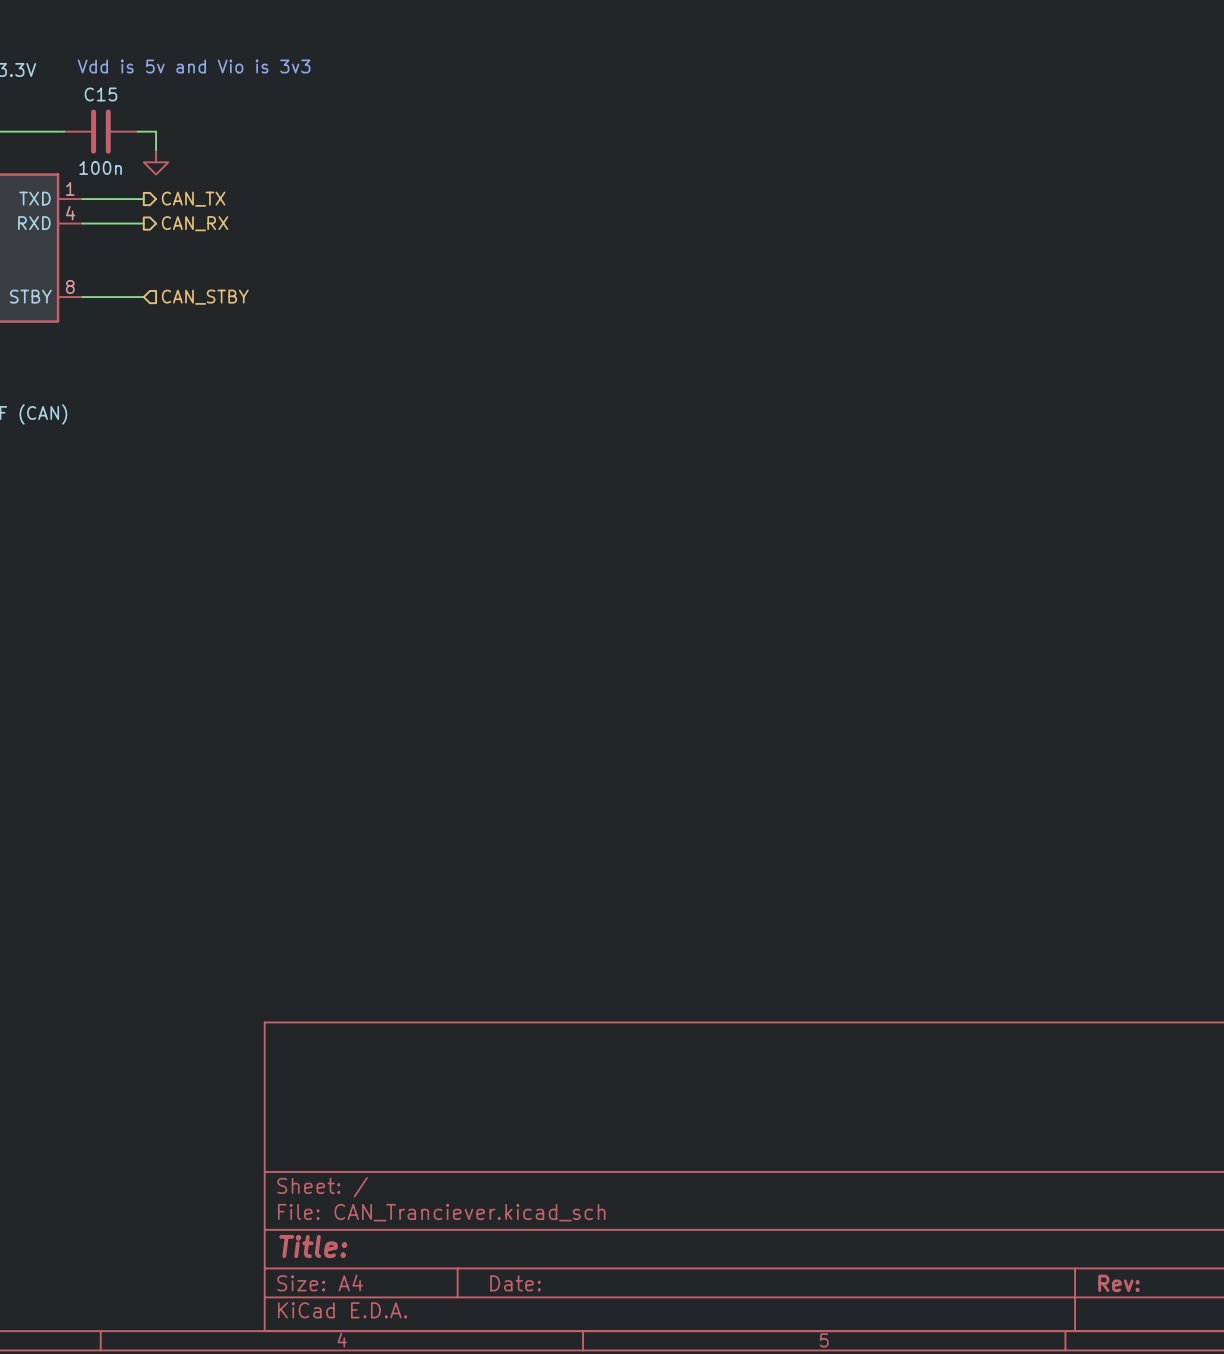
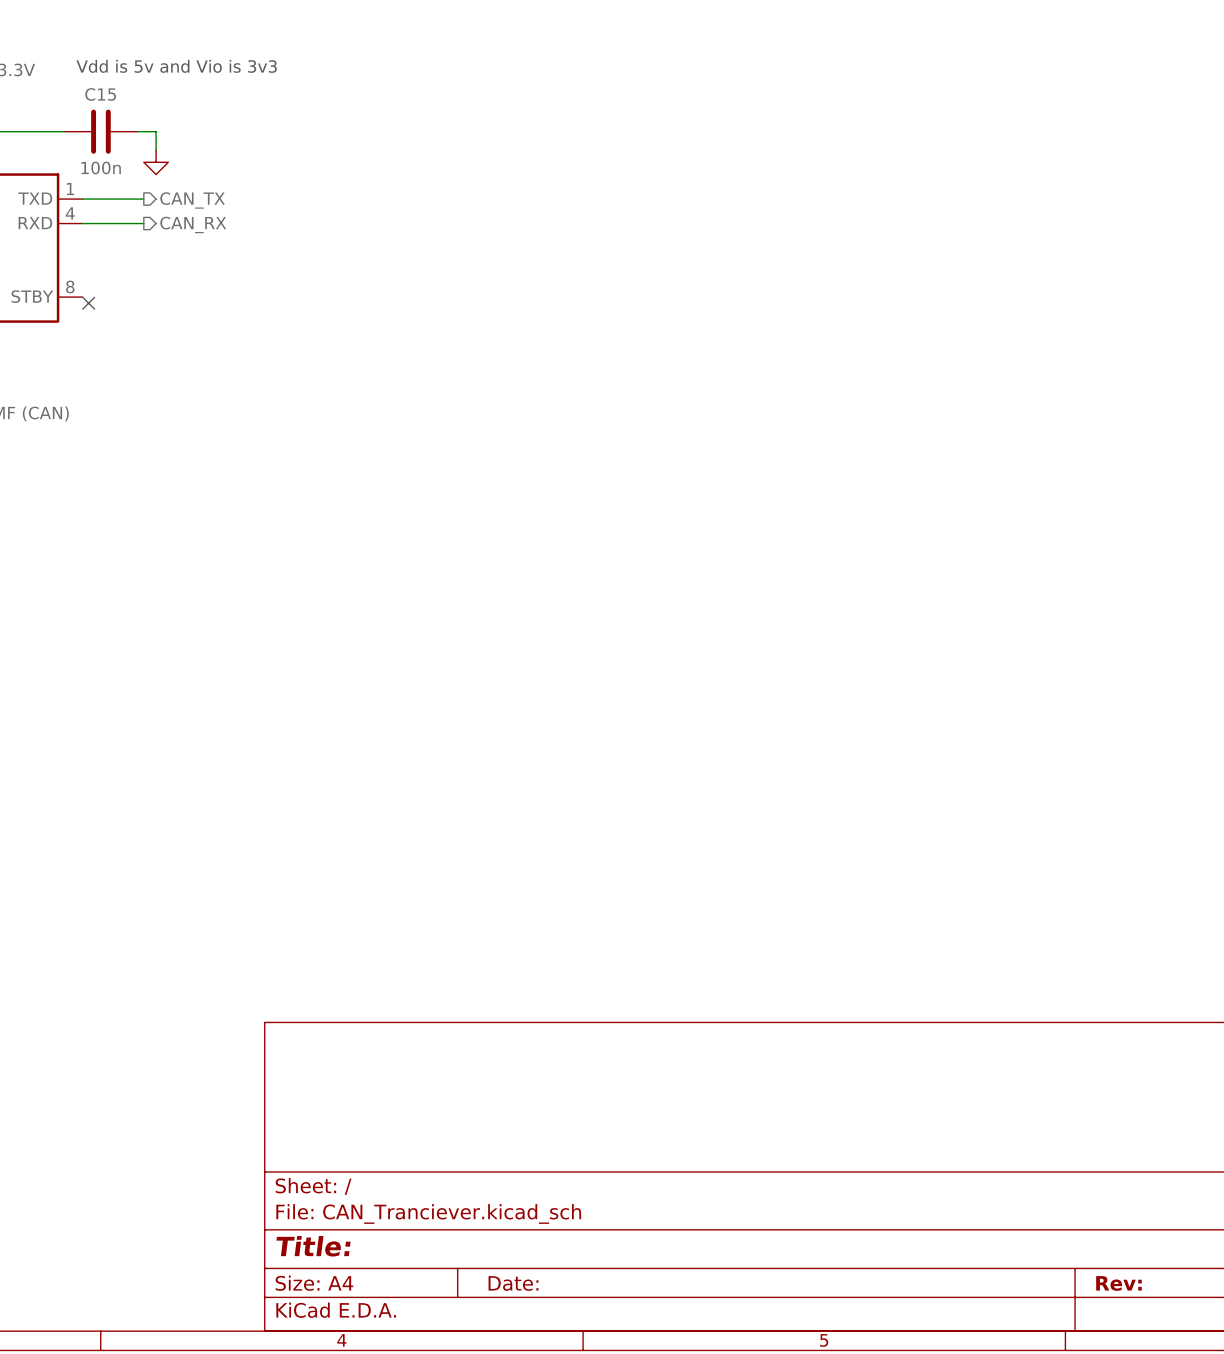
wire: (82, 297) (143, 297) -> none
hierarchical label: CAN_STBY (205, 297) -> none
no-connect mark: none -> (88, 303)

